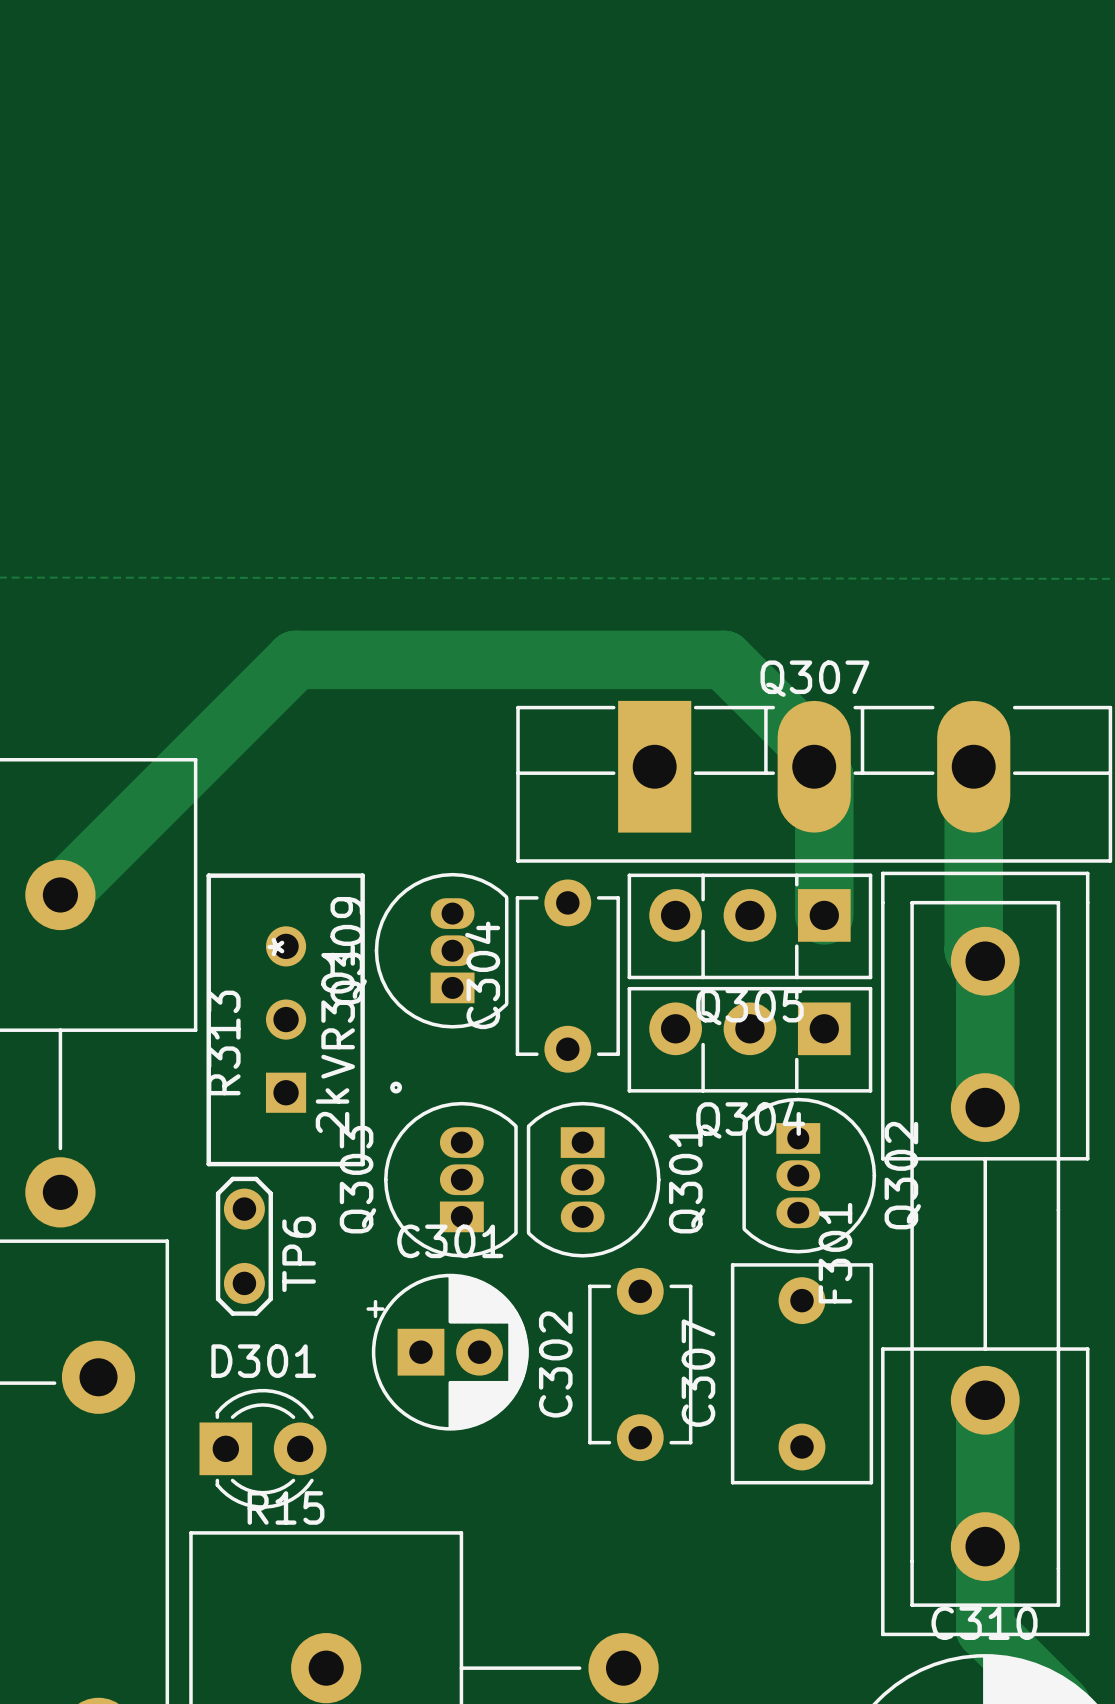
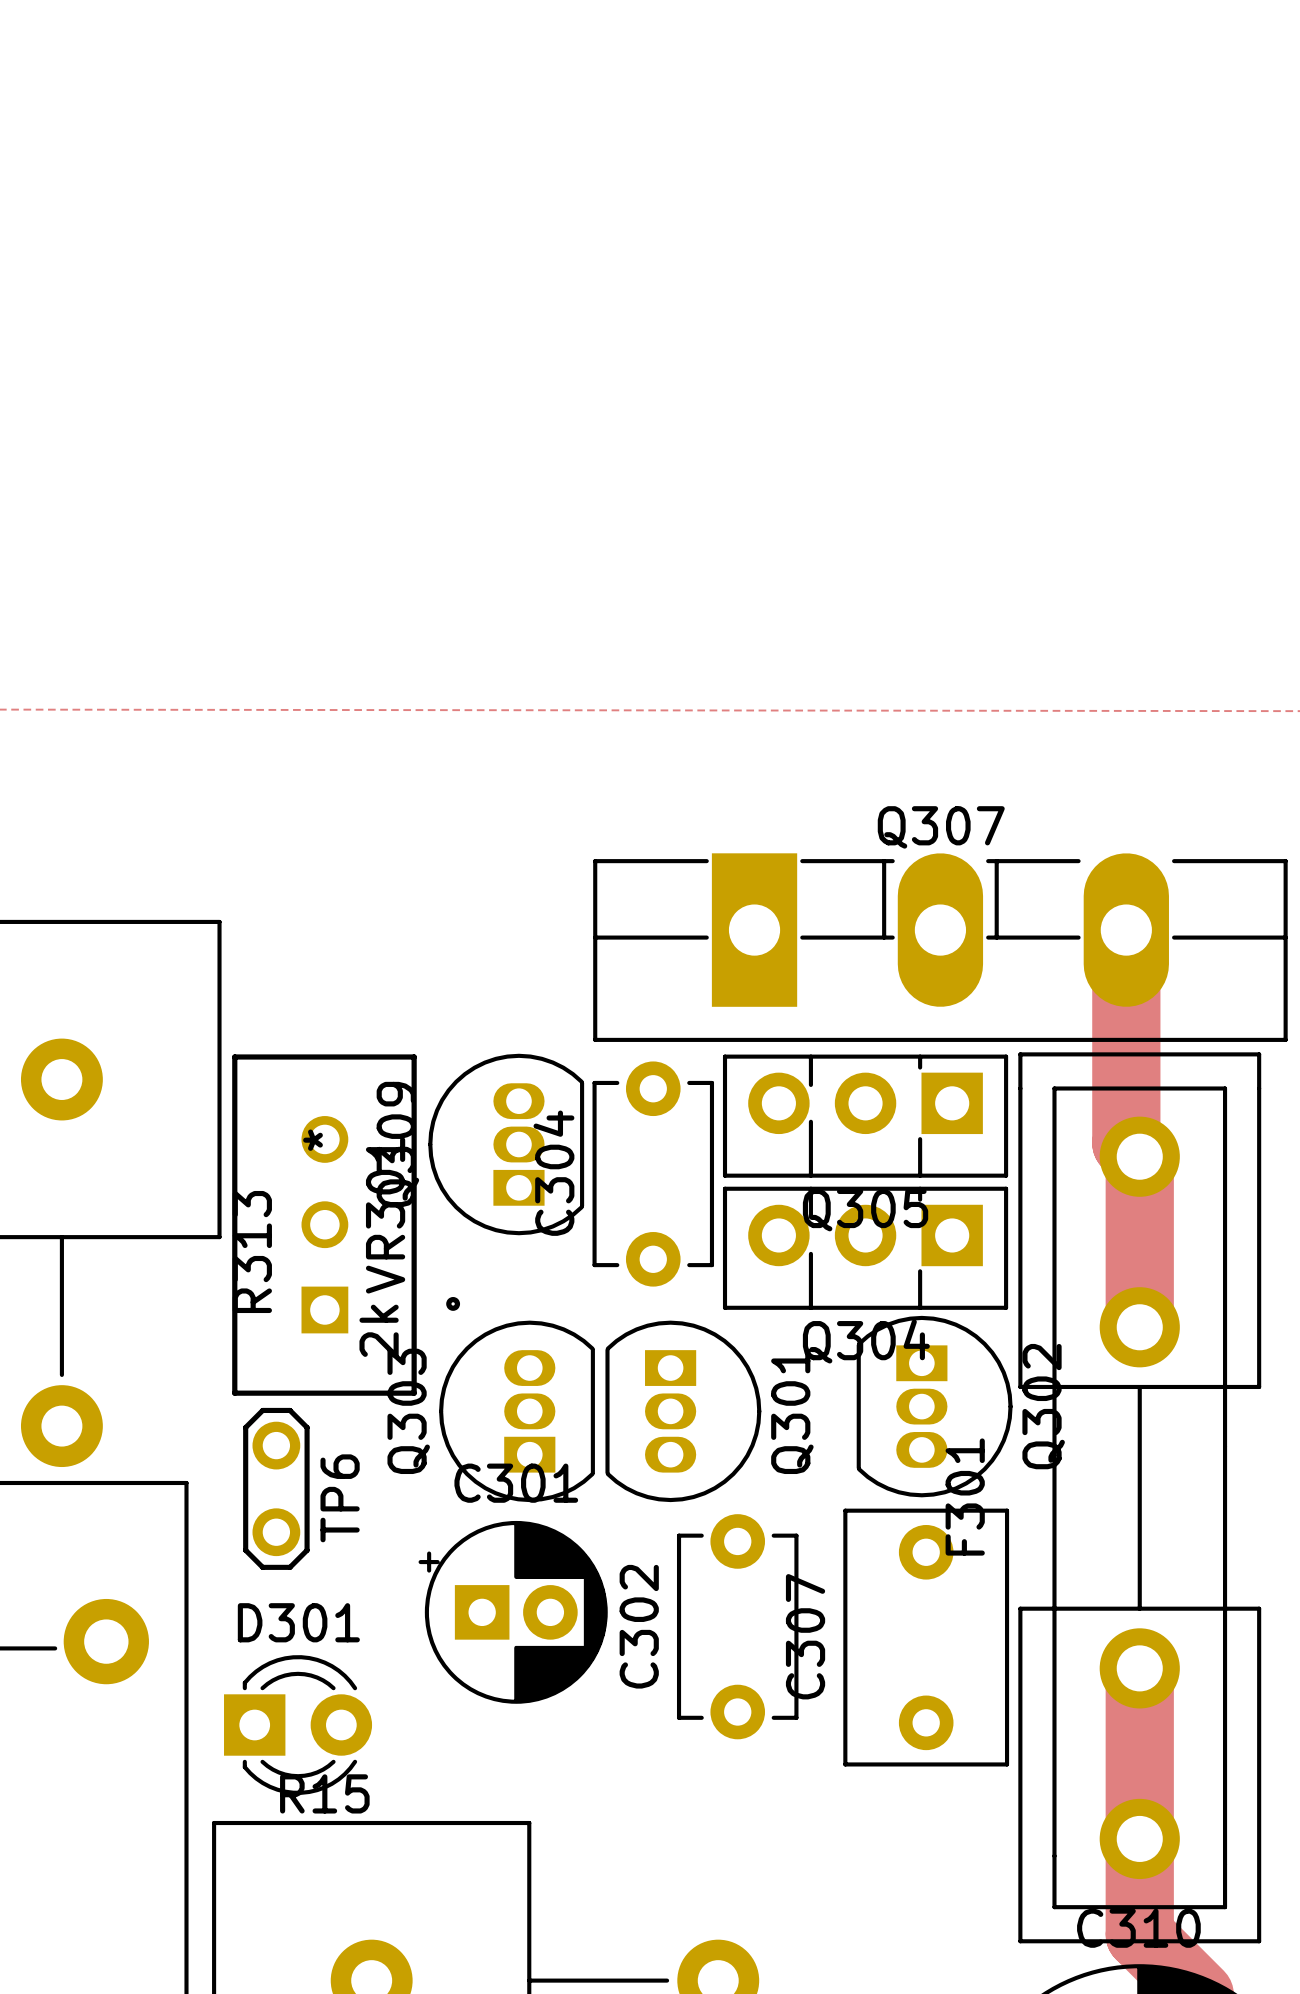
track: (60, 894) (295, 659) (724, 659) (814, 750) (814, 766) (824, 776) (824, 915) -> none

